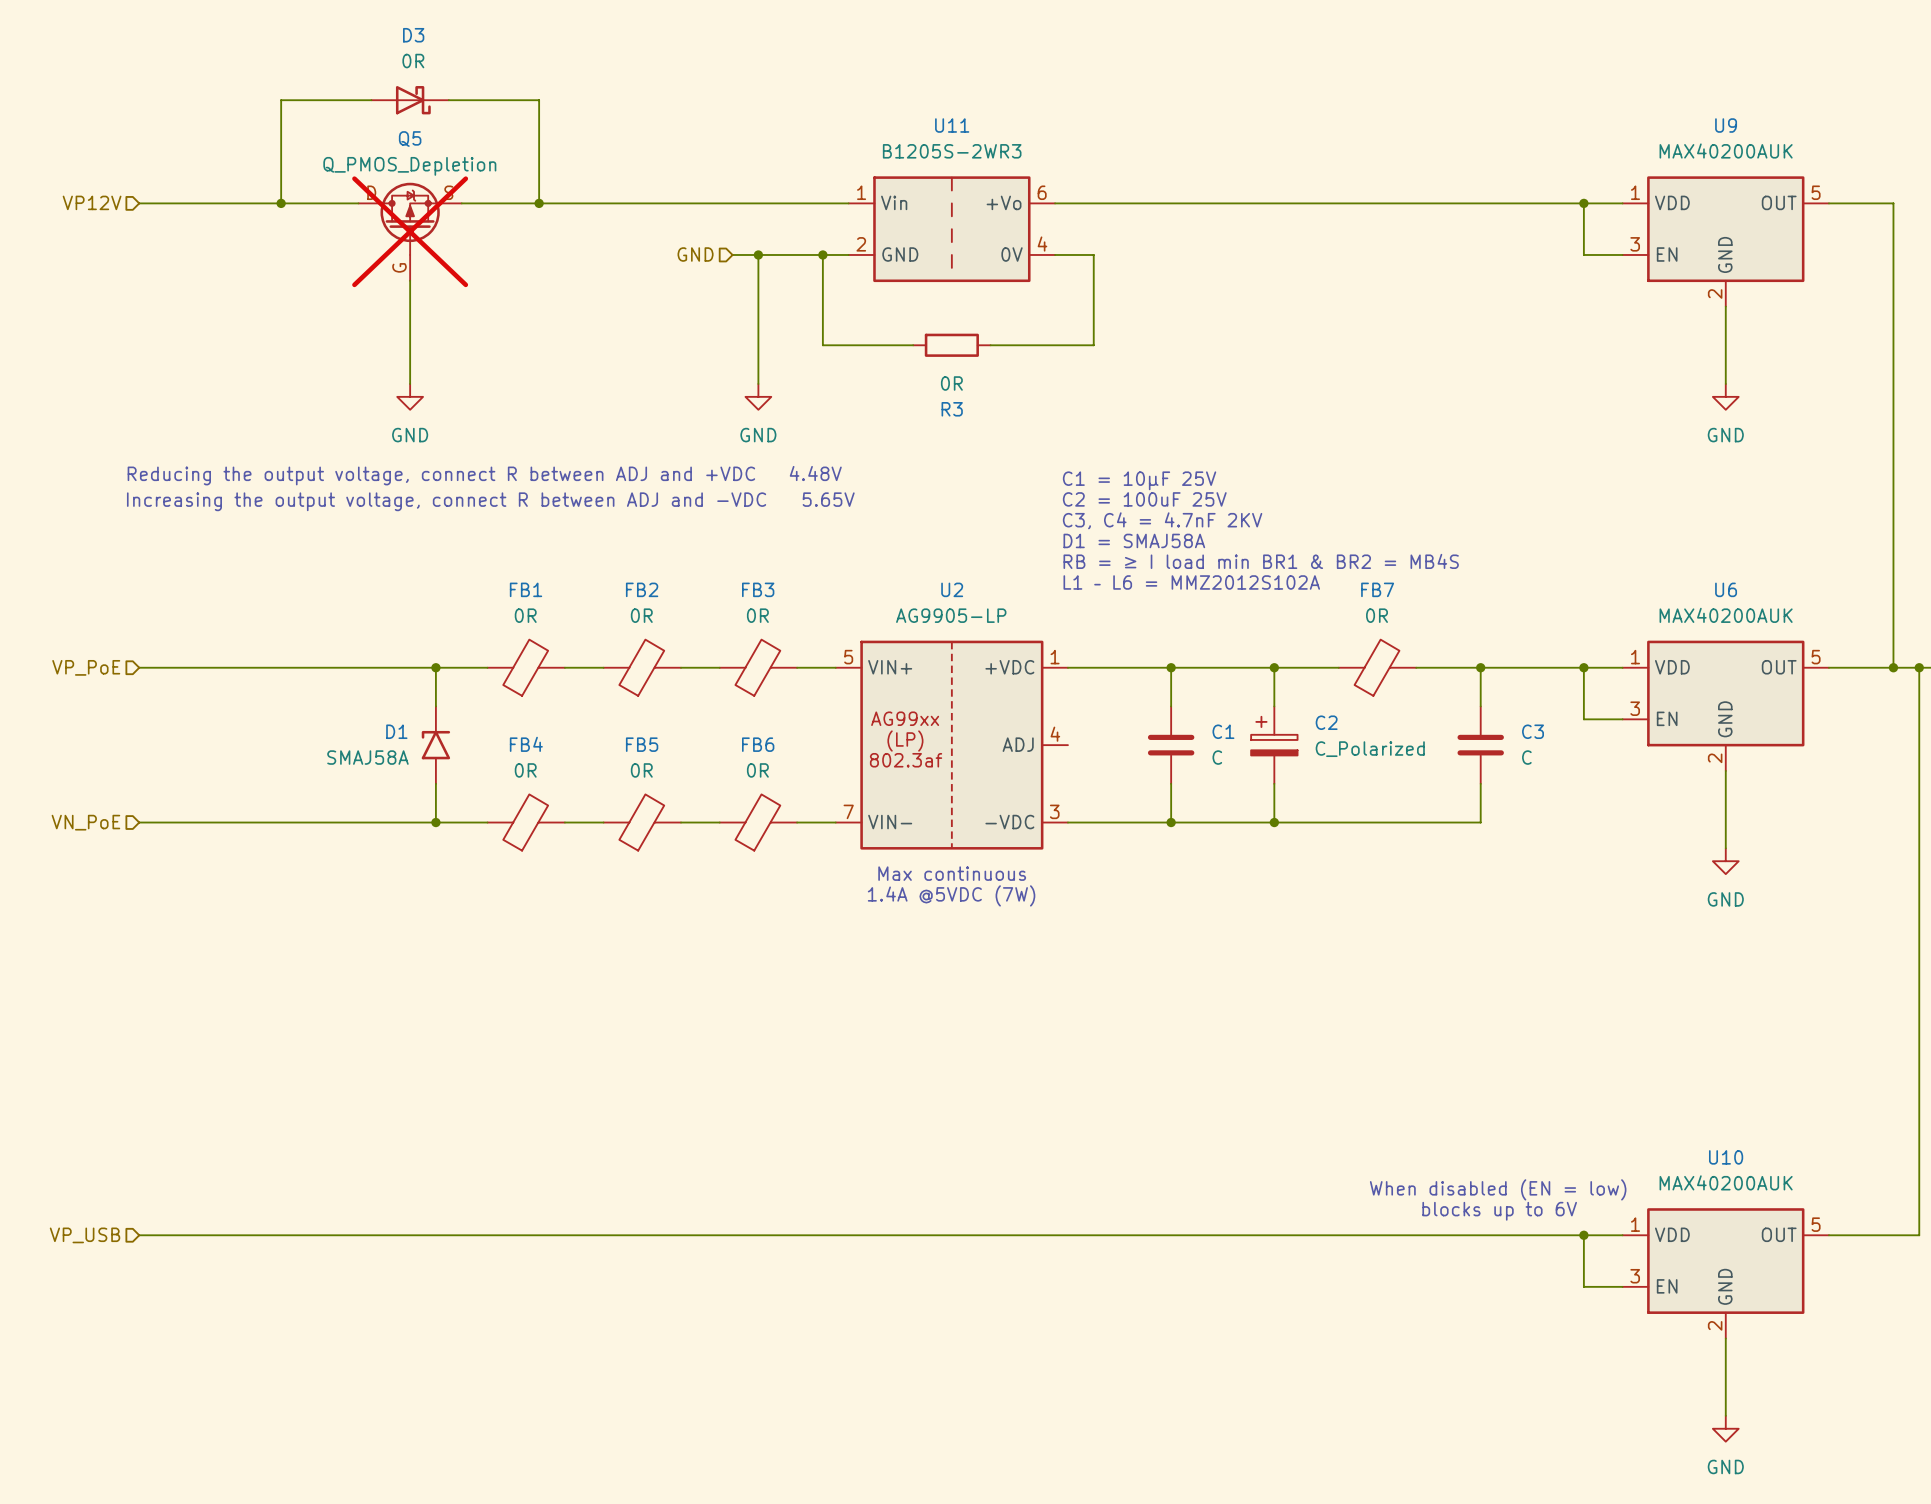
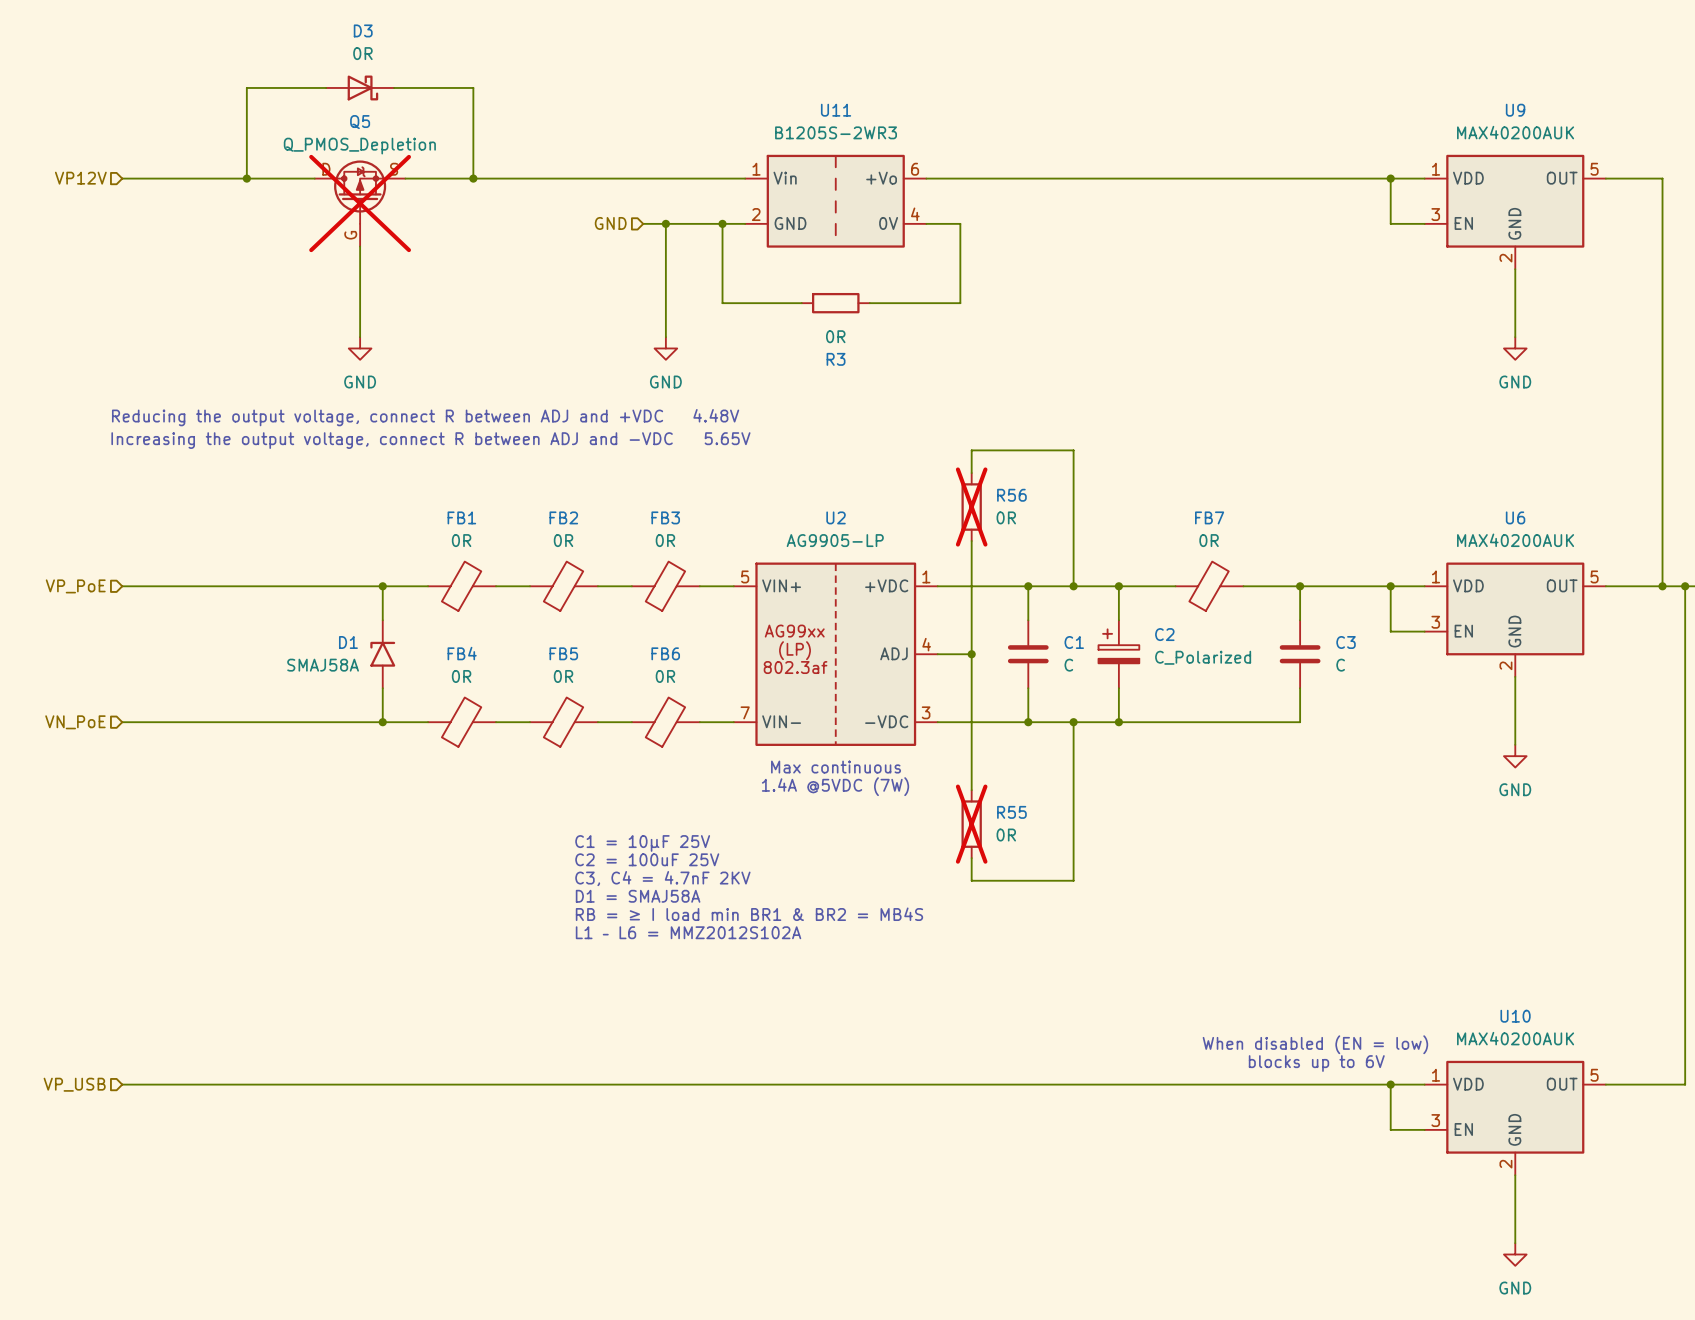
text: C1 = 10µF 25V (1139, 480) -> none
text: C2 = 100uF 25V (1144, 499) -> none
text: C3, C4 = 4.7nF 2KV (1162, 520) -> none
wire: none -> (971, 473) (971, 450) (1073, 450) (1073, 586)
text: D1 = SMAJ58A (1134, 540) -> none
text: RB = ≥ I load min BR1 & BR2 = MB4S (1261, 561) -> none
R56: none -> 0R (971, 507)
text: L1 – L6 = MMZ2012S102A (1191, 582) -> none
wire: none -> (971, 540) (971, 790)
junction: none -> (1073, 586)
wire: none -> (937, 654) (971, 654)
junction: none -> (971, 654)
wire: none -> (1073, 722) (1073, 880) (971, 880) (971, 858)
junction: none -> (1073, 722)
R55: none -> 0R (971, 824)
text: none -> C1 = 10µF 25V (642, 843)
text: none -> C2 = 100uF 25V (647, 859)
text: none -> C3, C4 = 4.7nF 2KV (662, 878)
text: none -> D1 = SMAJ58A (638, 896)
text: none -> RB = ≥ I load min BR1 & BR2 = MB4S (749, 914)
text: none -> L1 – L6 = MMZ2012S102A (688, 932)

